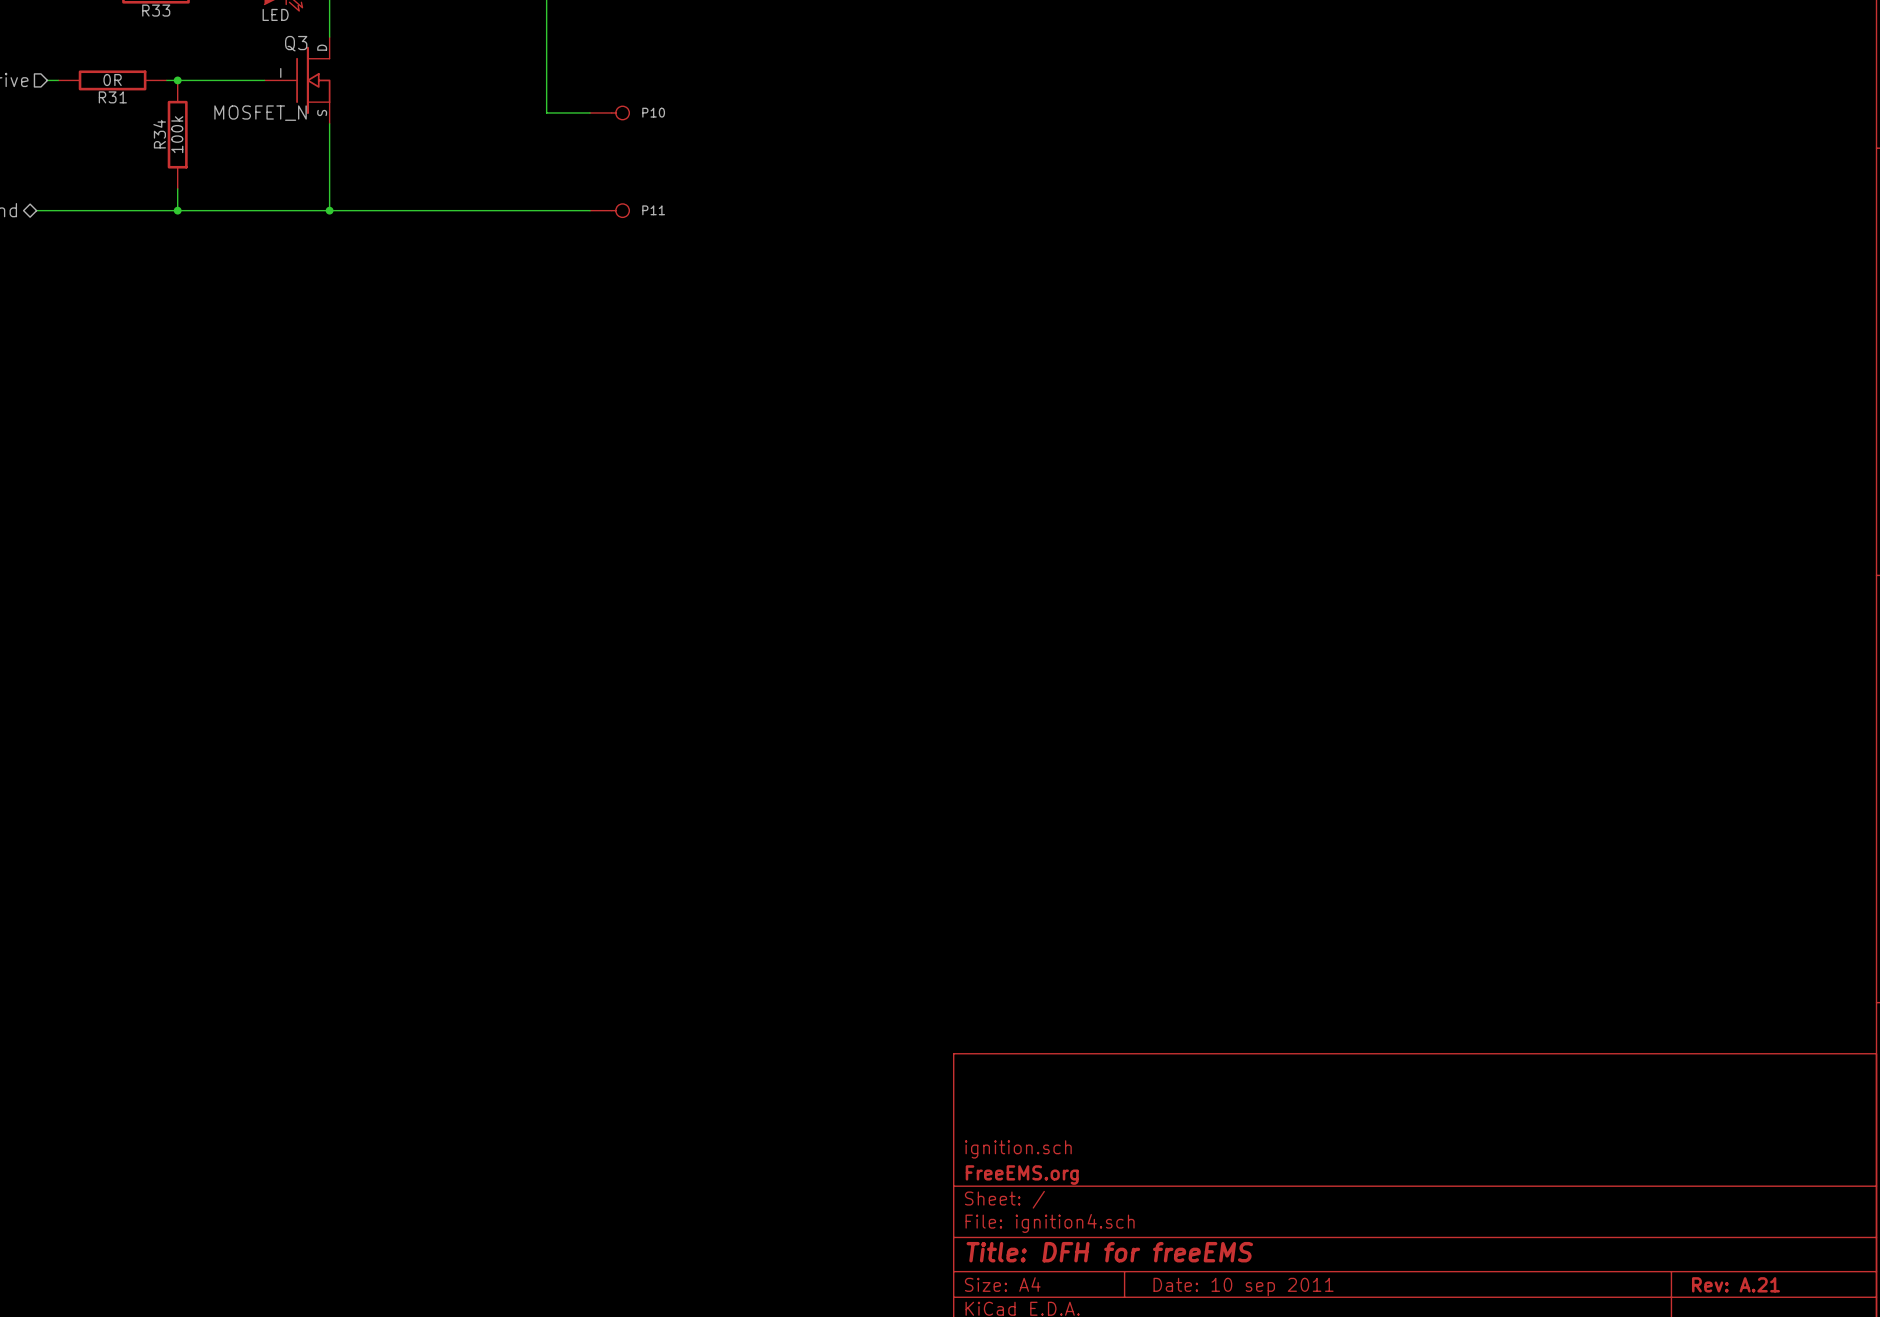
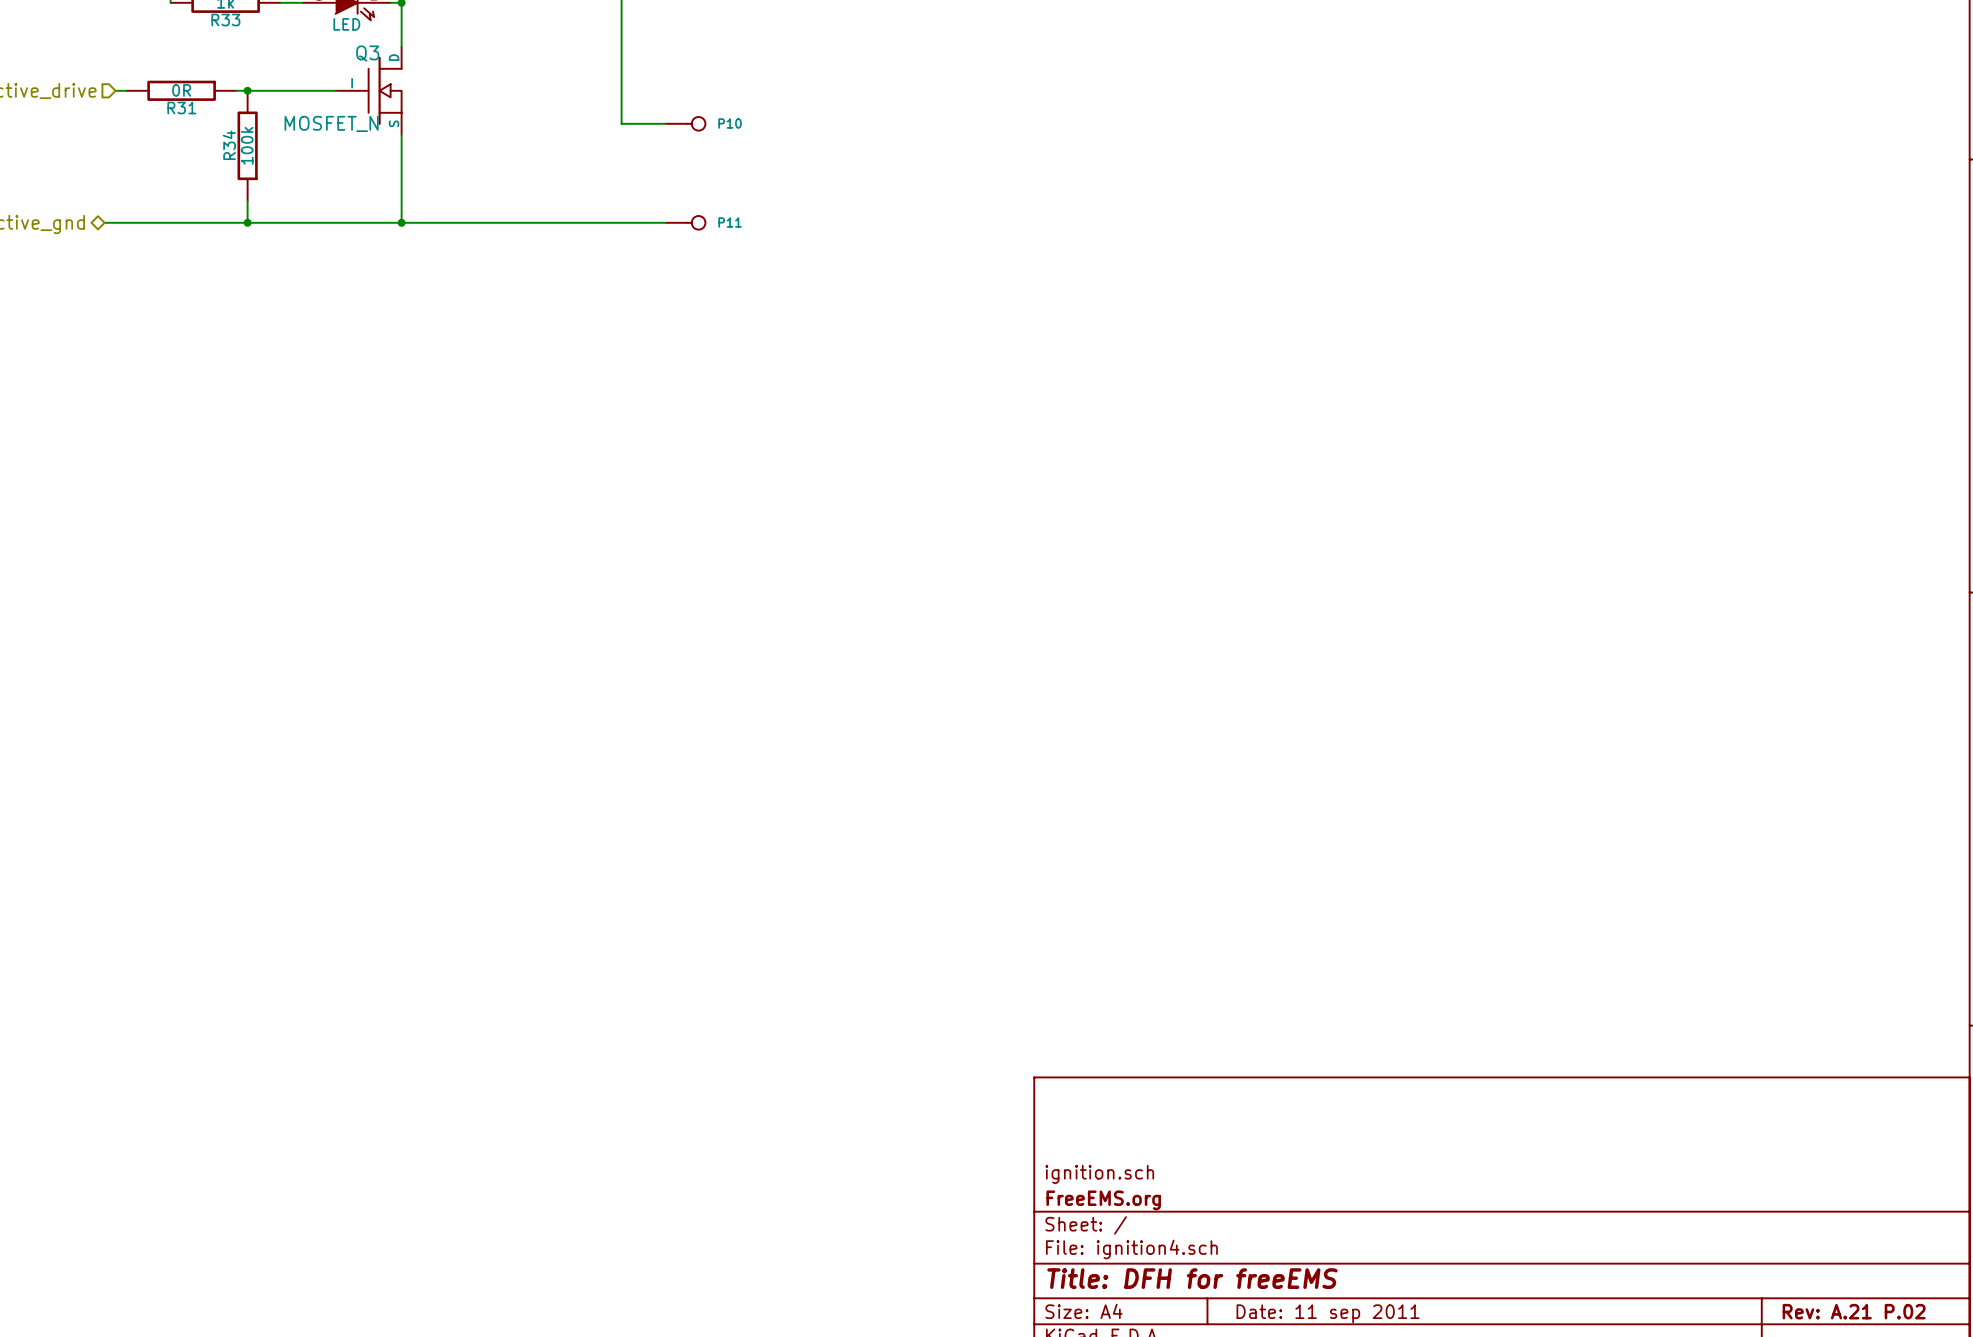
title block: Rev: A.21 (1735, 1284) -> Rev: A.21 P.02 (1854, 1311)
title block: Date: 10 sep 2011 (1243, 1286) -> Date: 11 sep 2011 (1328, 1313)

